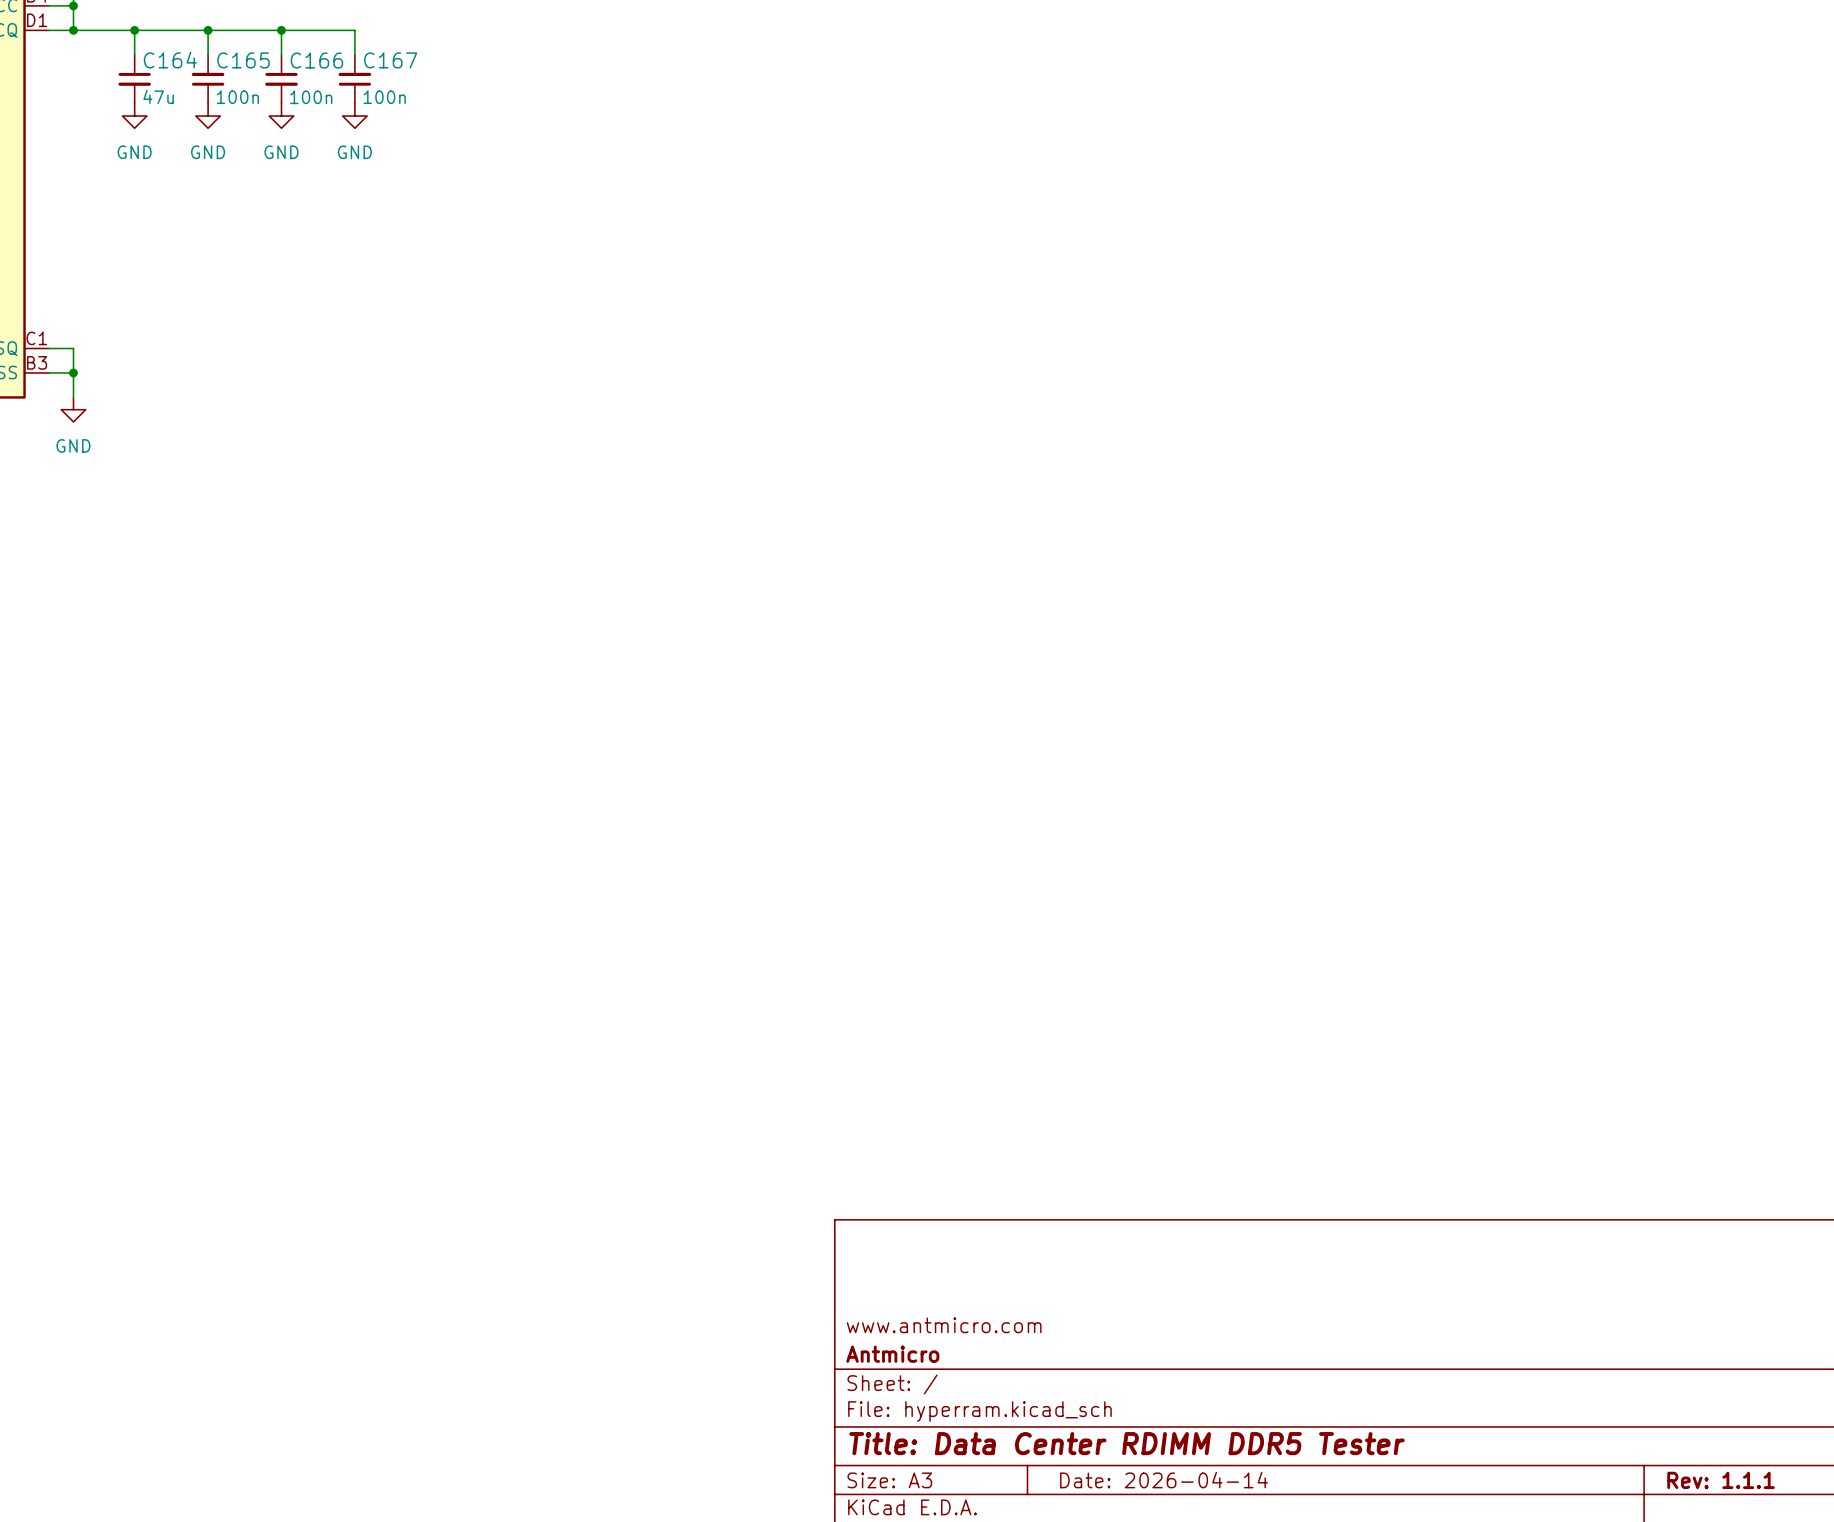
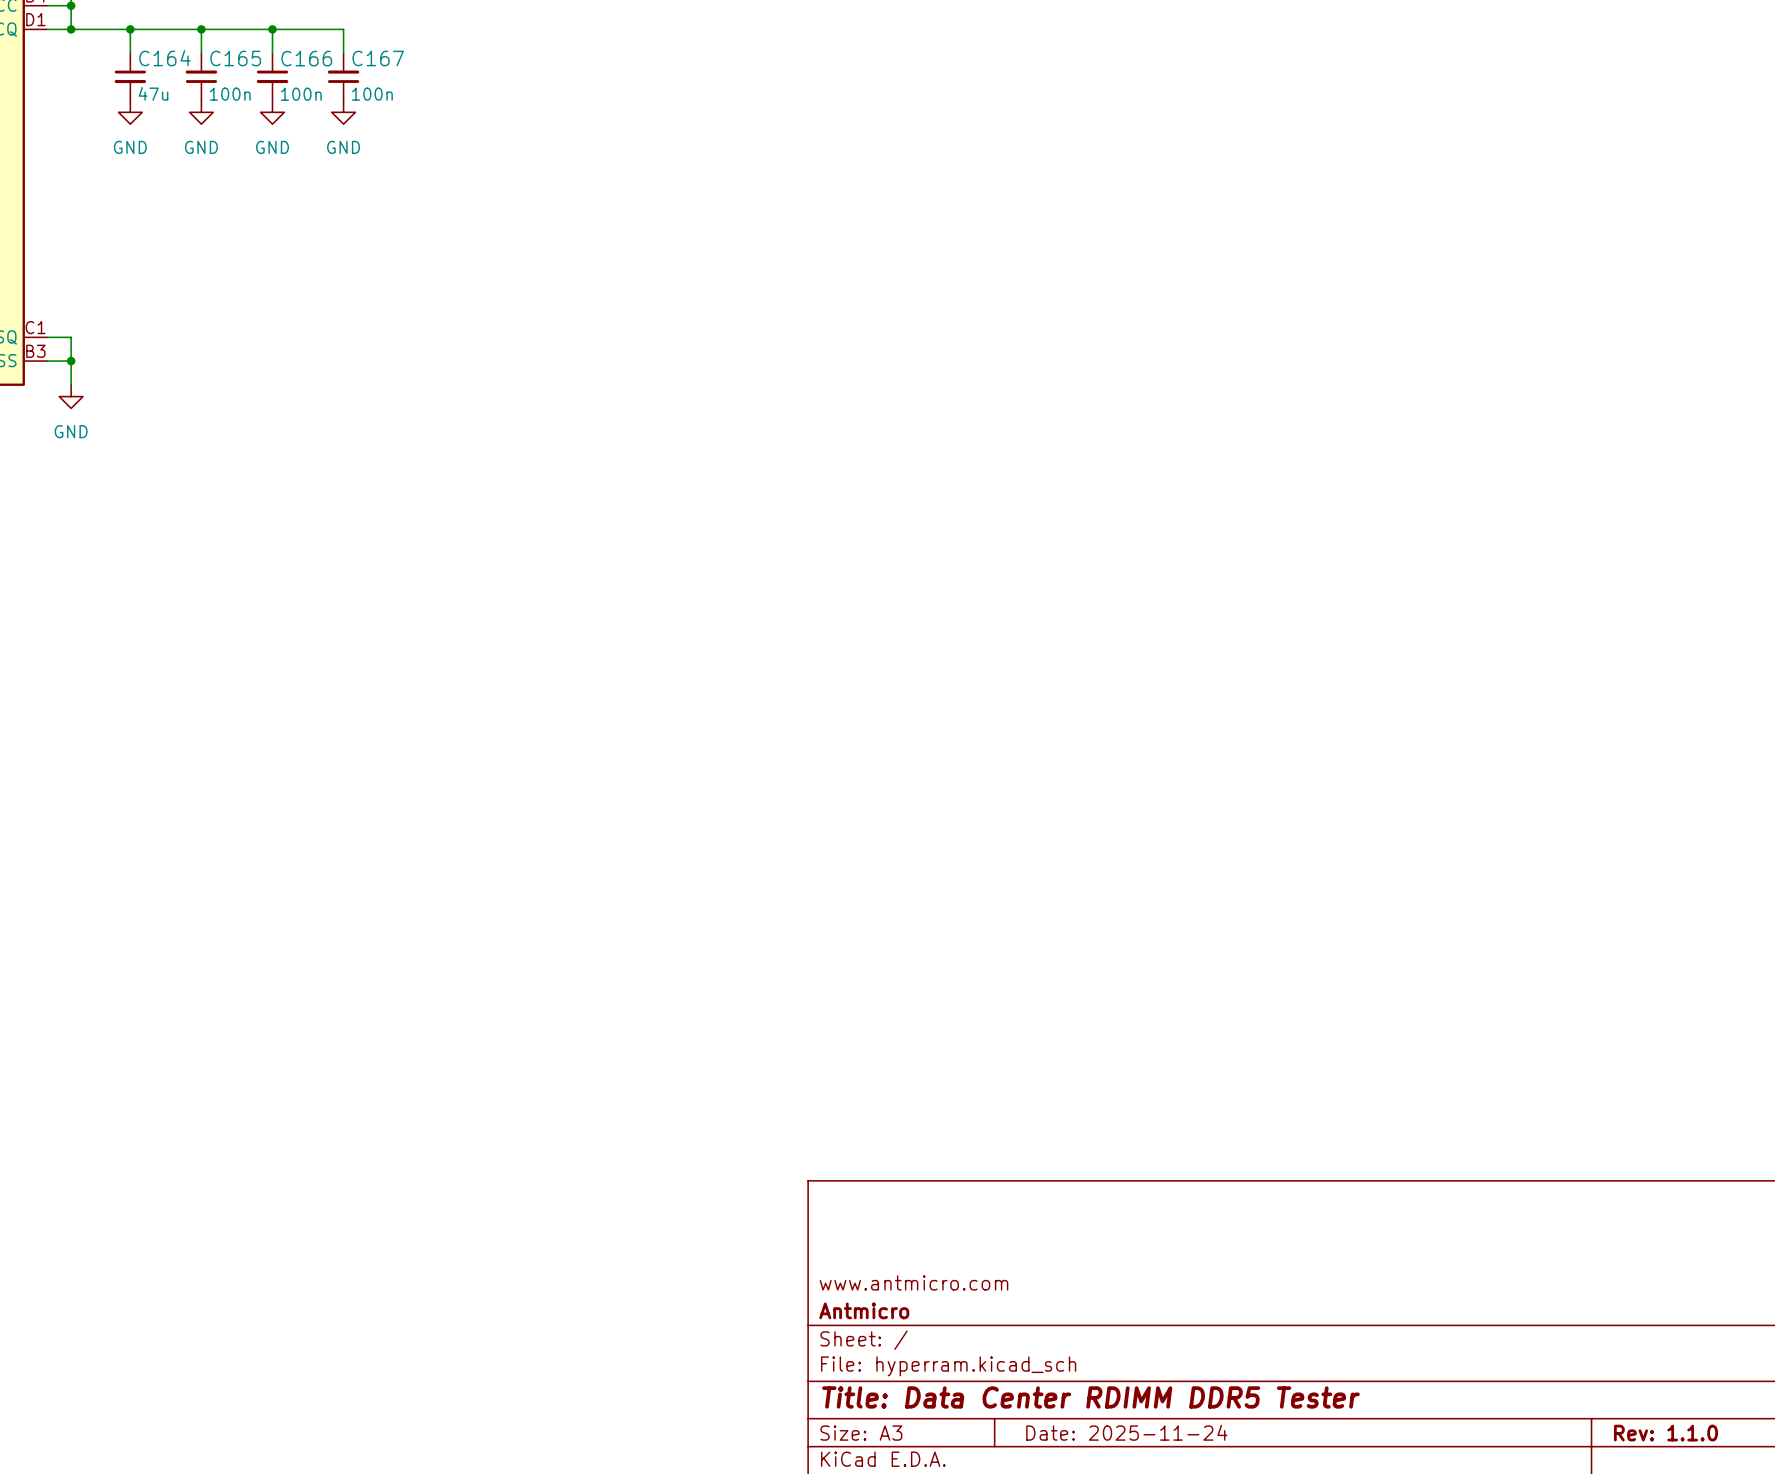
title block: Date: 2026-04-14 (1164, 1480) -> Date: 2025-11-24 (1126, 1432)
title block: Rev: 1.1.1 (1721, 1480) -> Rev: 1.1.0 (1665, 1433)

